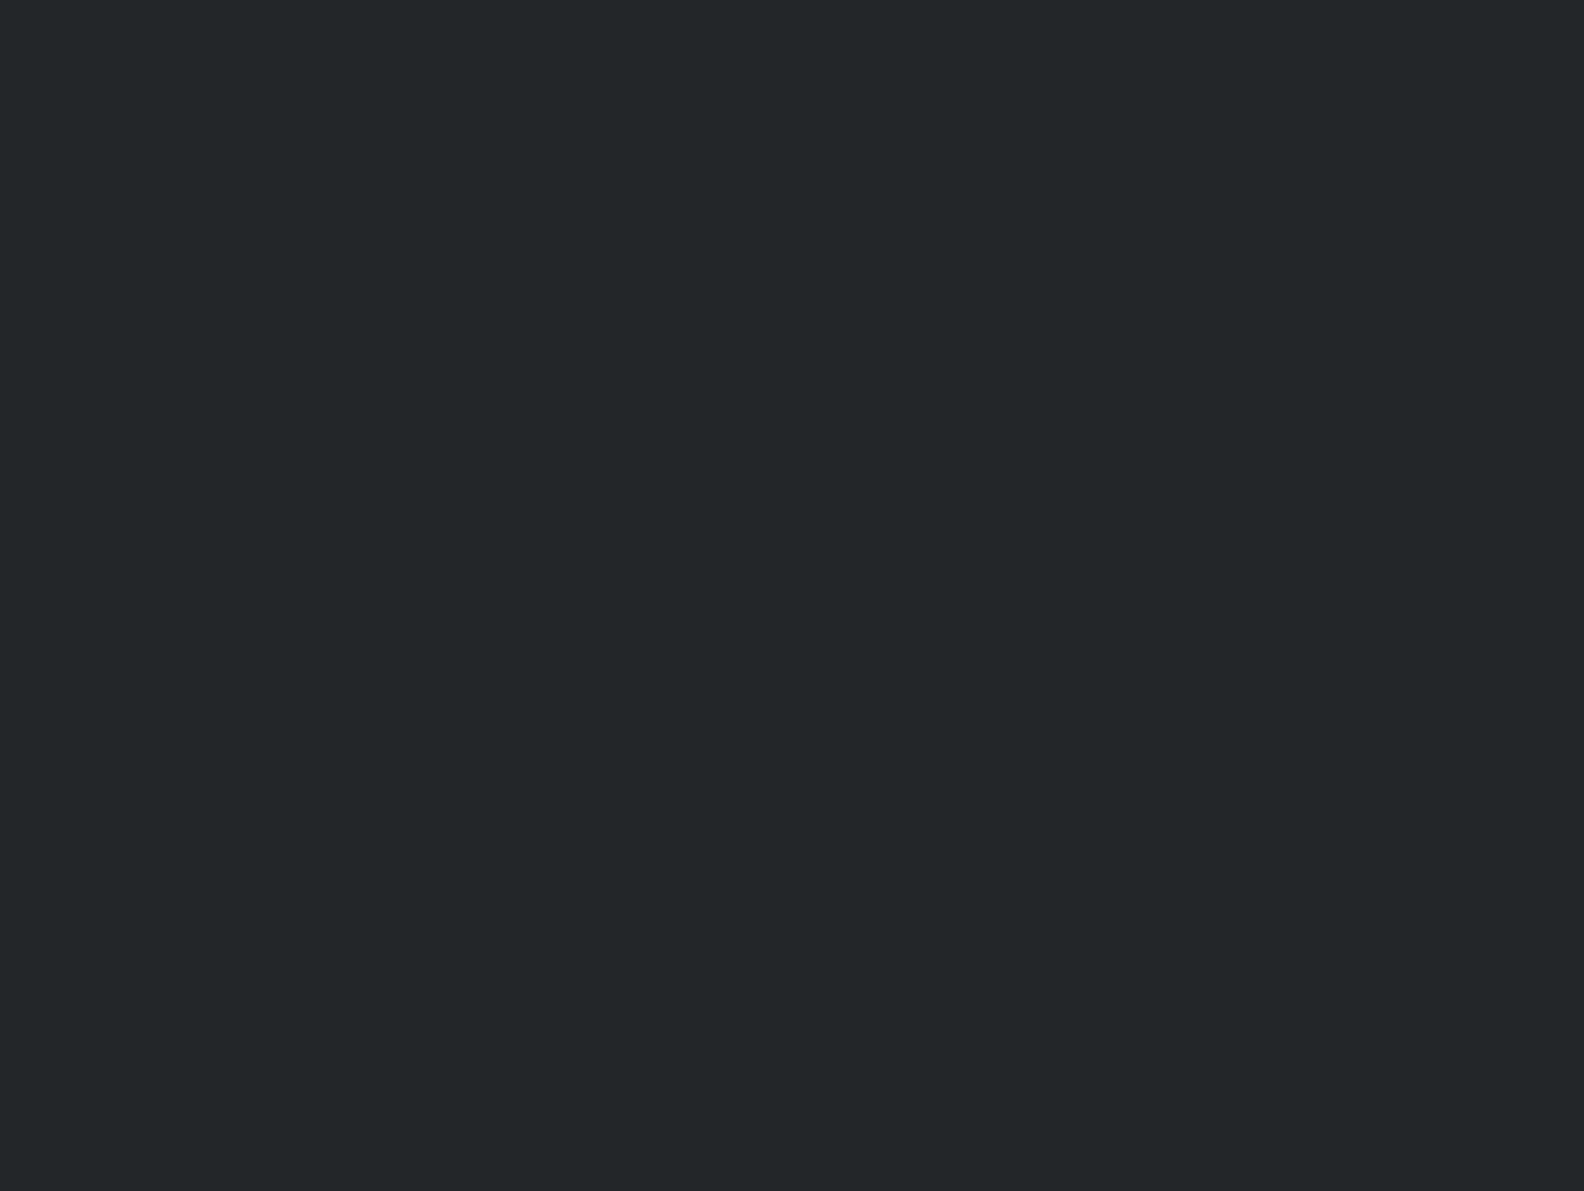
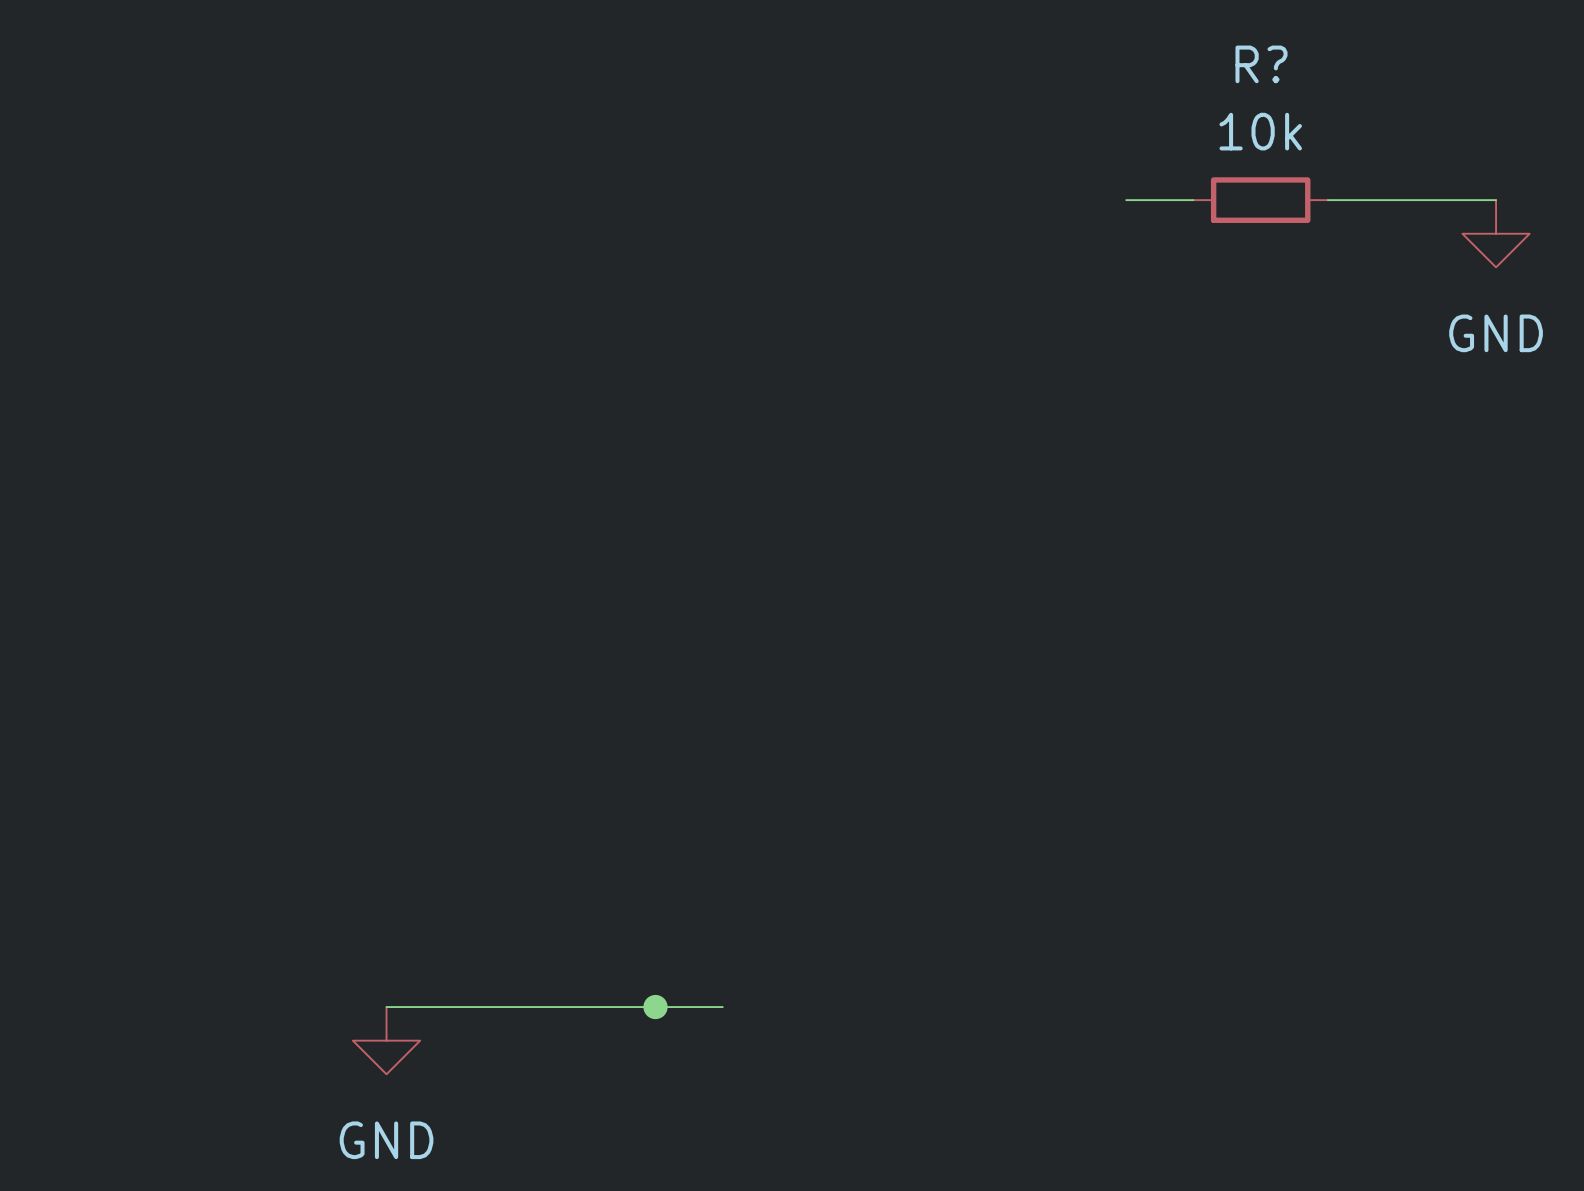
wire: none -> (1126, 200) (1193, 200)
R?: none -> 10k (1260, 200)
wire: none -> (1327, 200) (1496, 200)
power symbol: none -> GND (1496, 233)
wire: none -> (386, 1007) (722, 1007)
junction: none -> (655, 1007)
power symbol: none -> GND (386, 1040)

